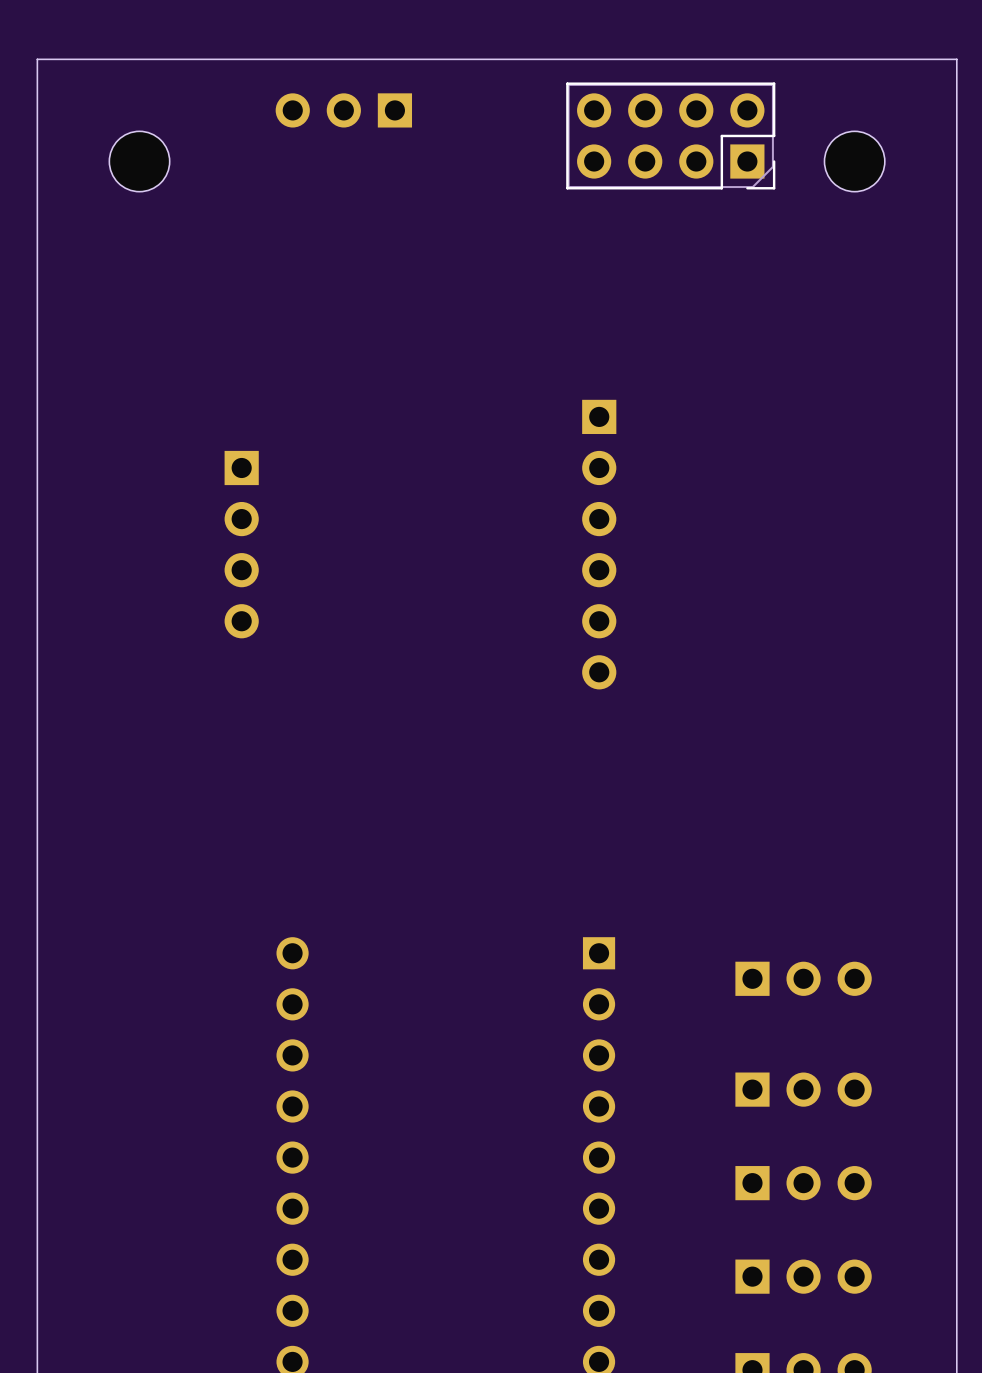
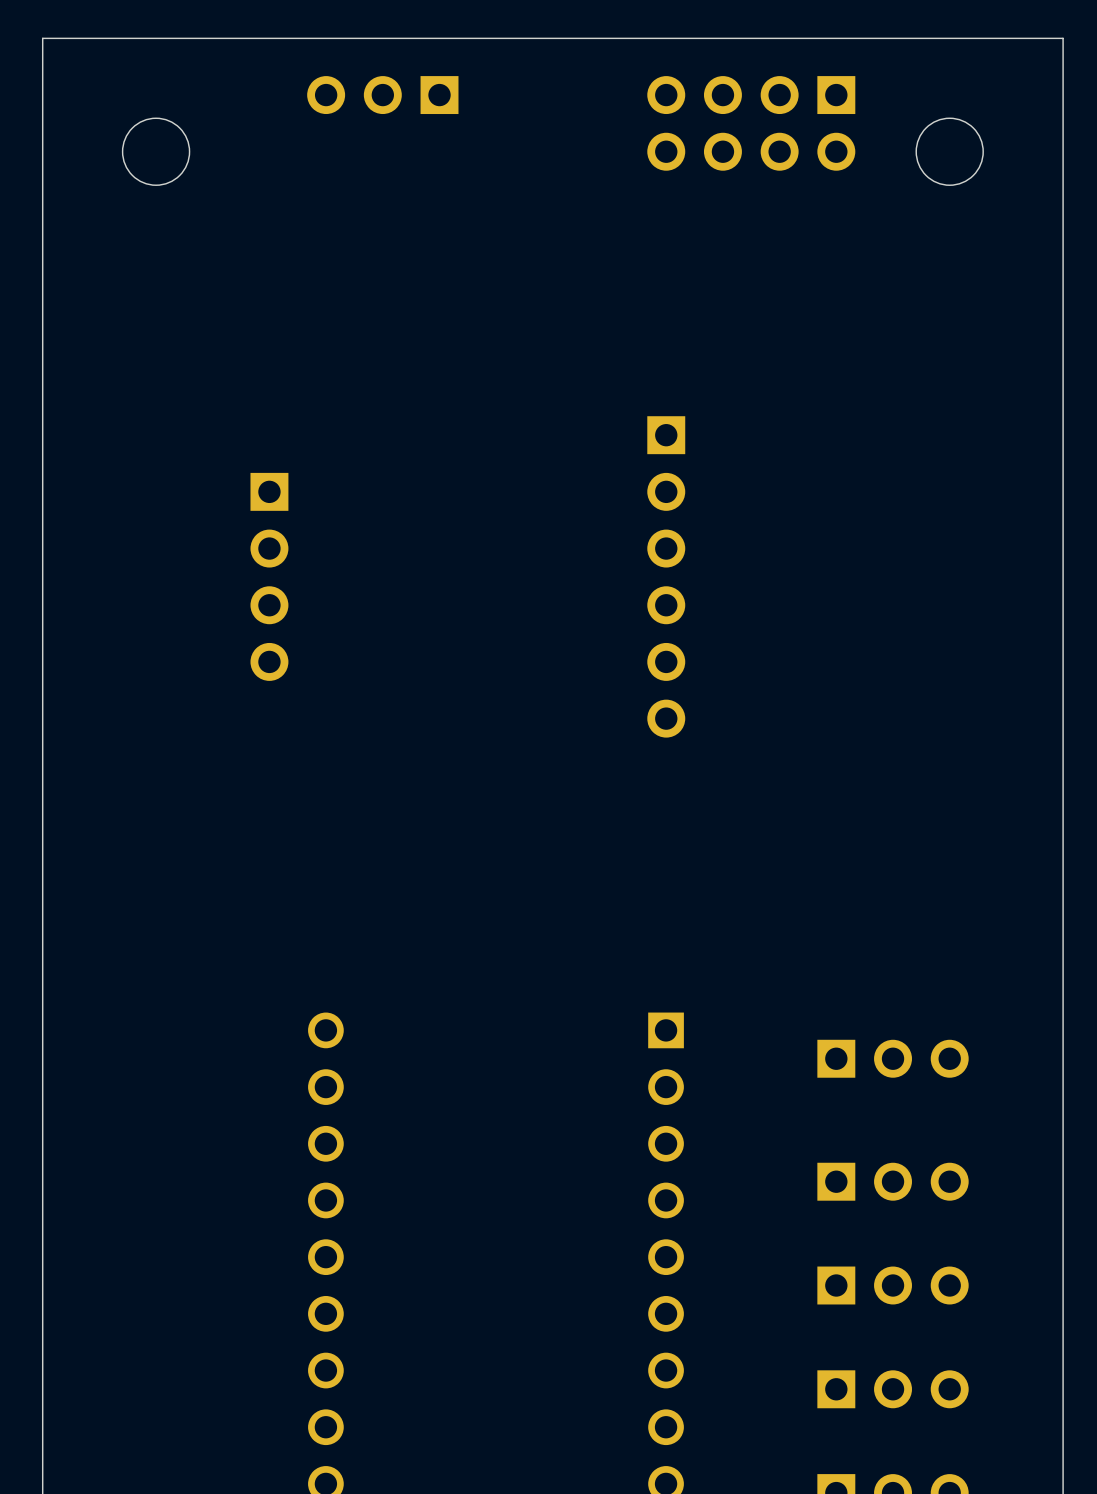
part side: bottom (670, 135) -> top (751, 123)

